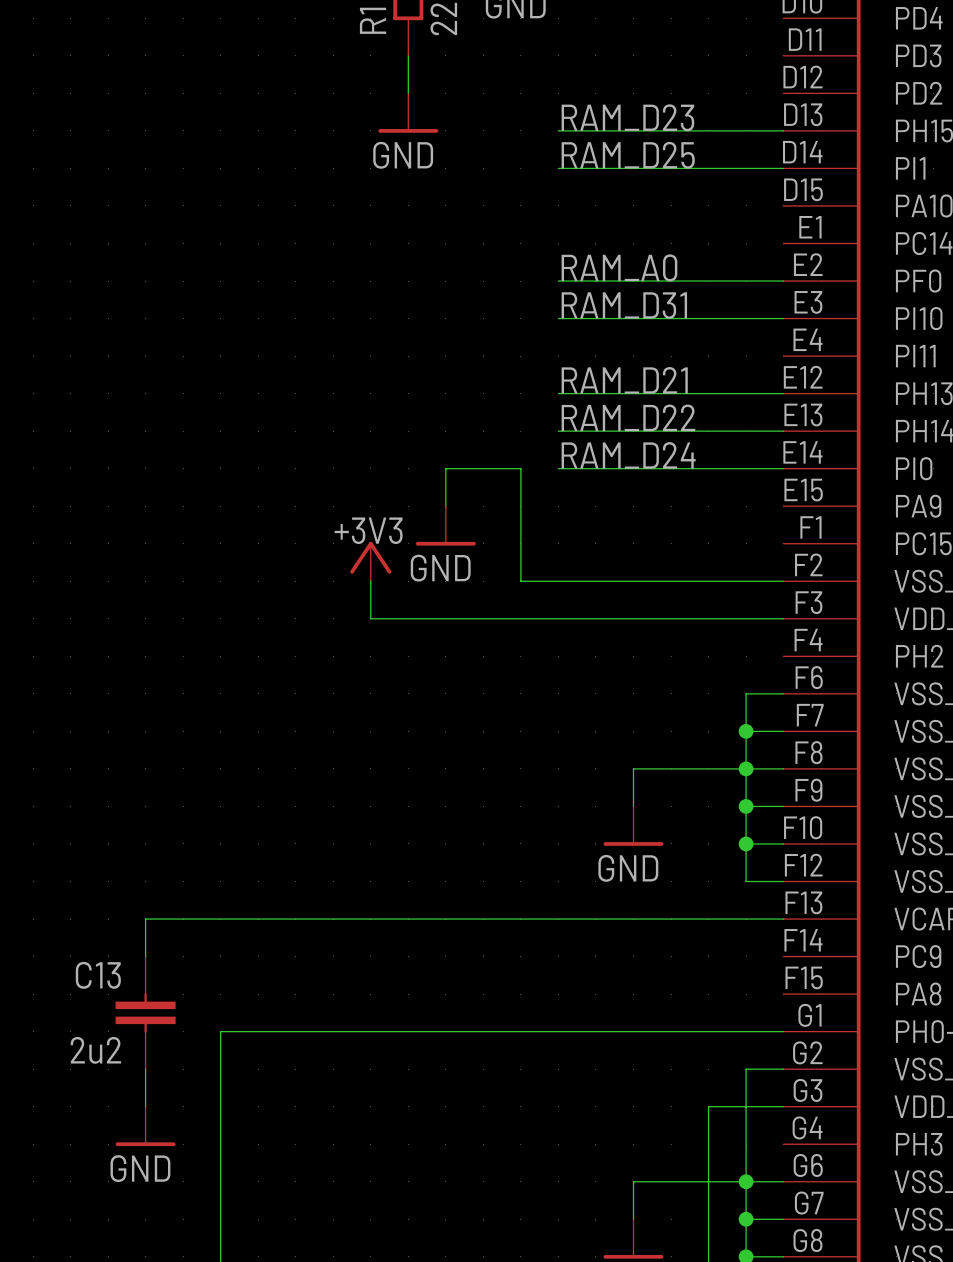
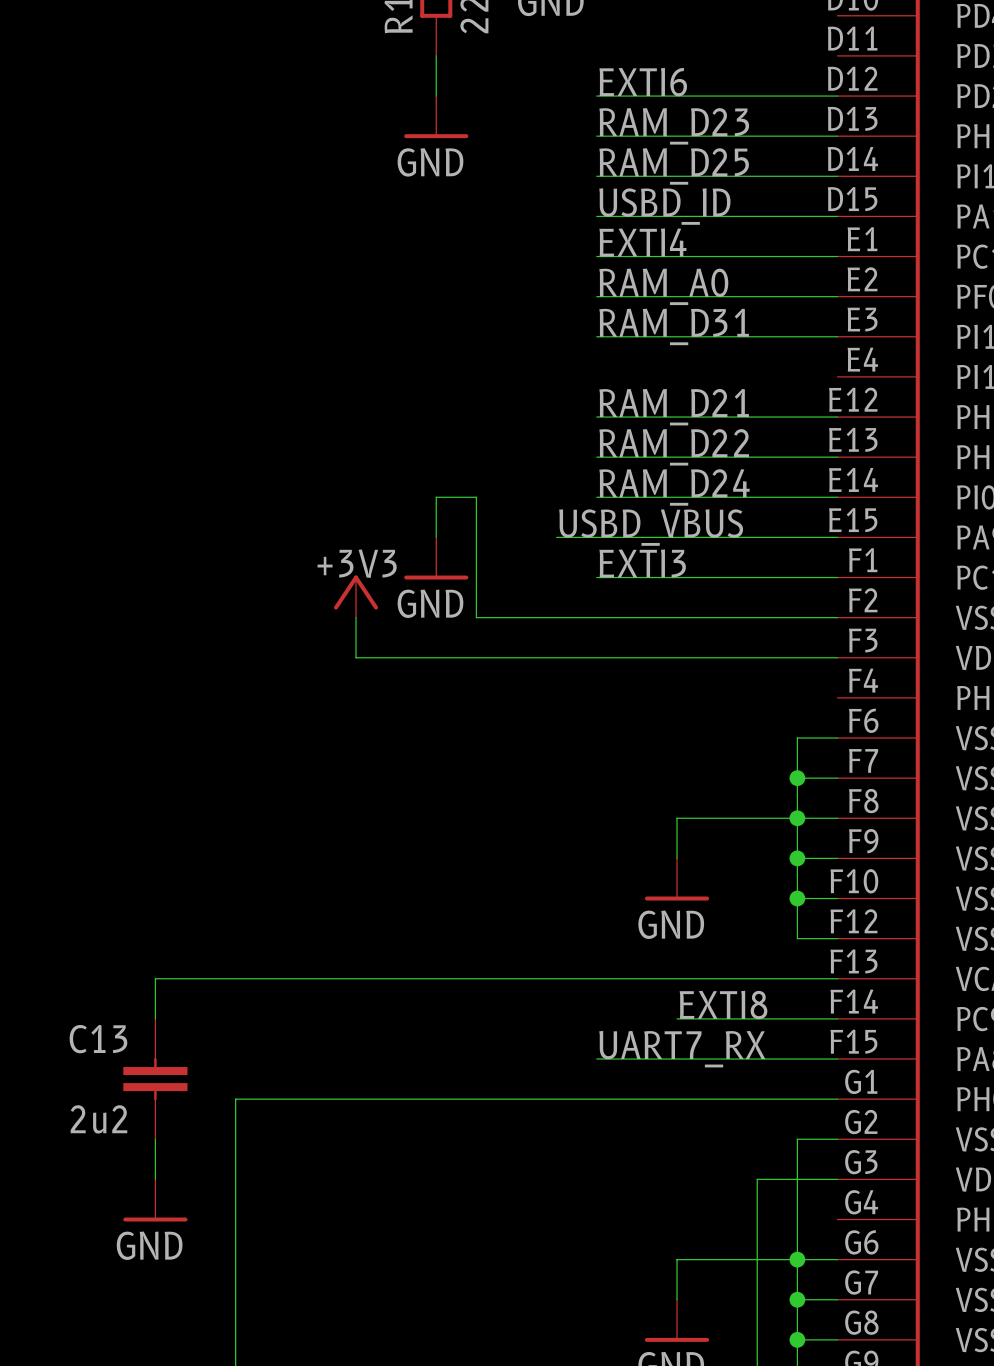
label: none -> EXTI6 (643, 82)
wire: none -> (596, 96) (837, 96)
label: none -> USBD_ID (664, 206)
wire: none -> (596, 216) (837, 216)
label: none -> EXTI4 (643, 242)
wire: none -> (596, 256) (837, 256)
wire: (445, 468) (520, 468) (520, 581) -> (476, 537) (476, 617) (556, 617)
wire: none -> (476, 497) (436, 497) (436, 537)
label: none -> USBD_VBUS (651, 527)
wire: none -> (556, 537) (837, 537)
power symbol position: GND (445, 525) -> GND (436, 558)
label: none -> EXTI3 (642, 563)
wire: none -> (596, 577) (837, 577)
power symbol position: +3V3 (370, 561) -> +3V3 (356, 596)
wire: (370, 581) (370, 618) -> (356, 617) (356, 657) (396, 657)
label: none -> EXTI8 (723, 1005)
wire: none -> (677, 1018) (837, 1018)
label: none -> UART7_RX (682, 1049)
wire: none -> (596, 1059) (837, 1059)

